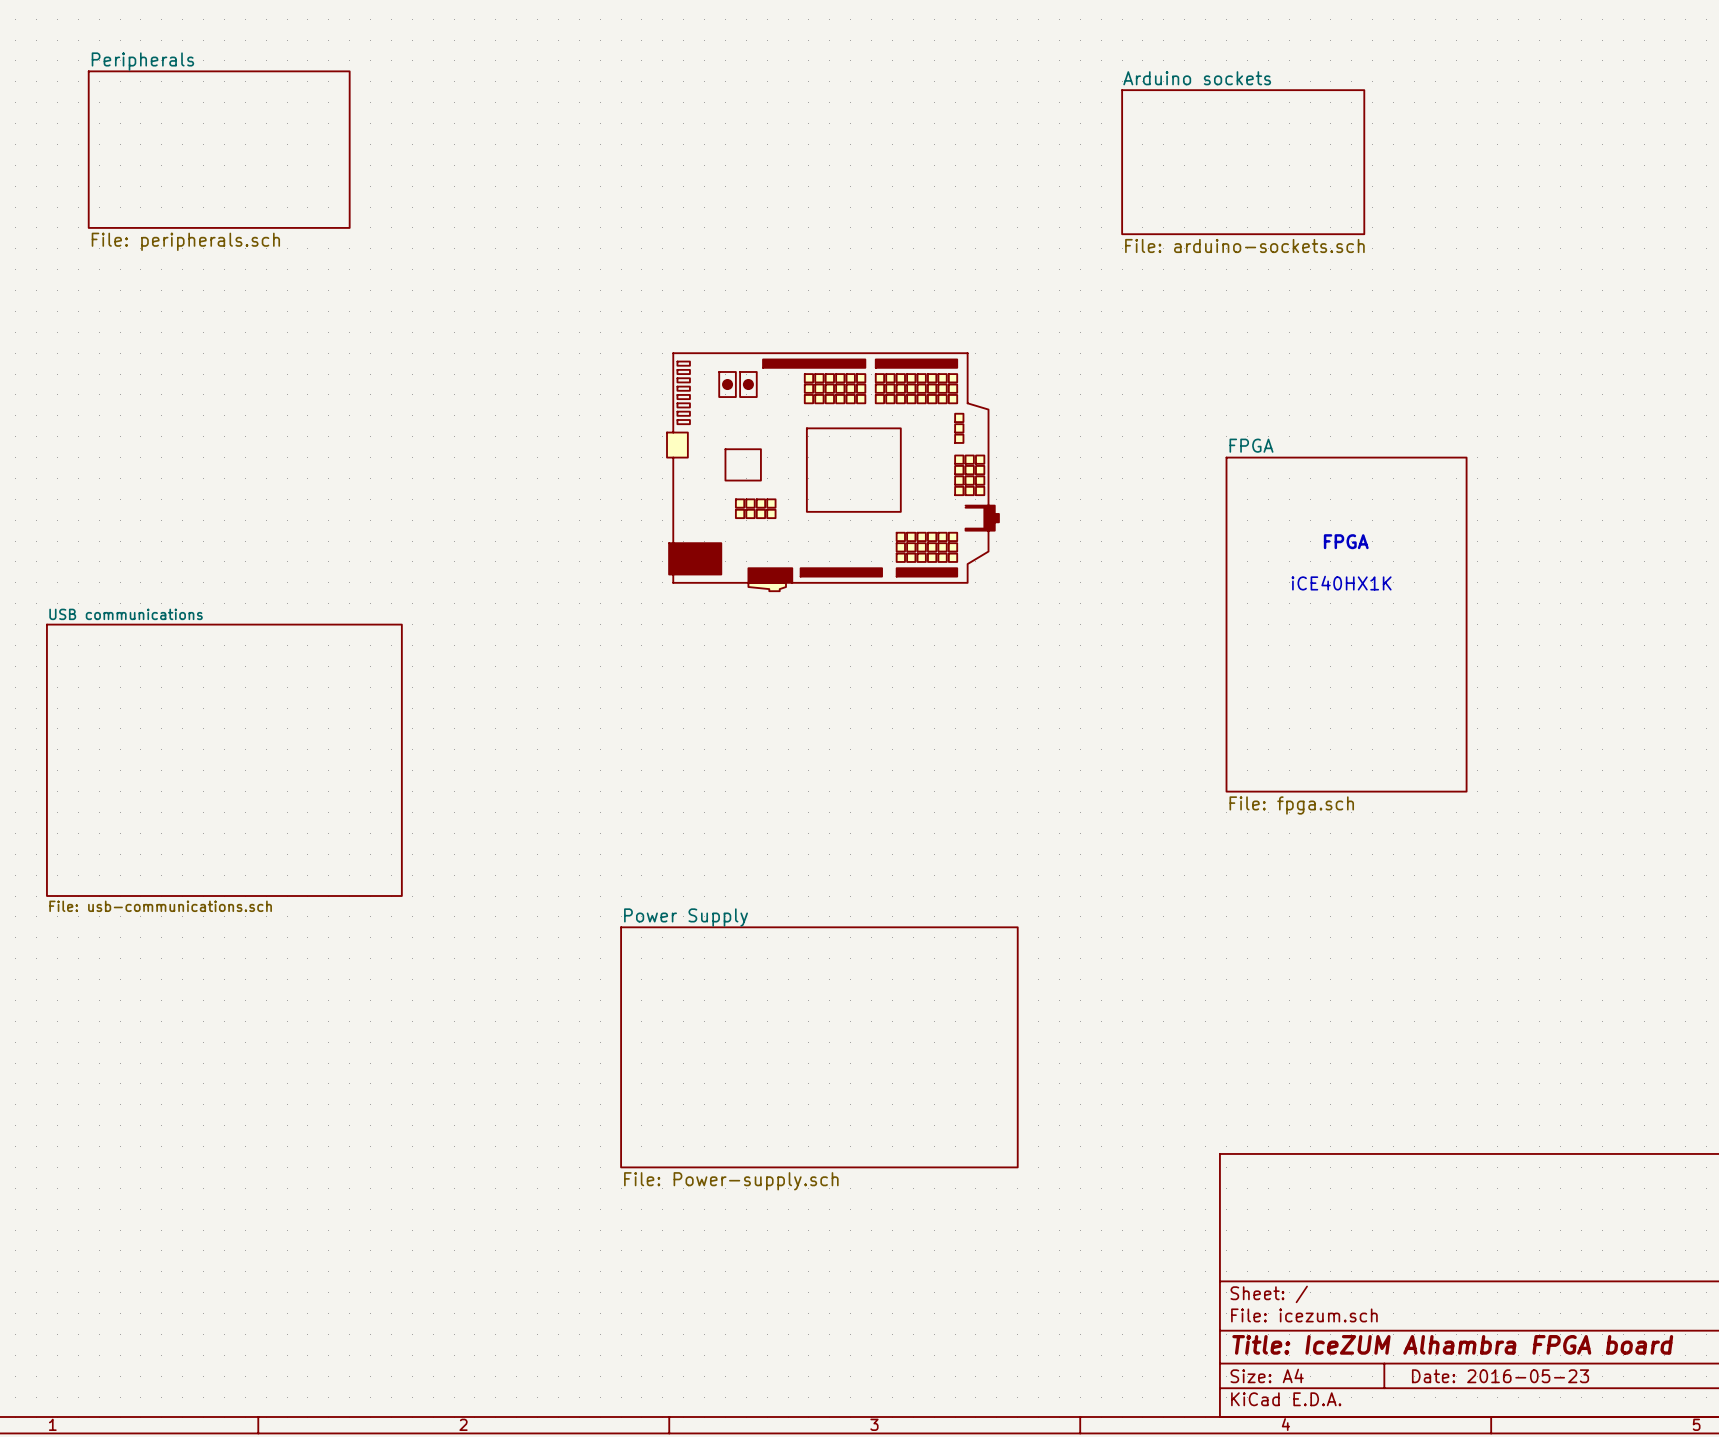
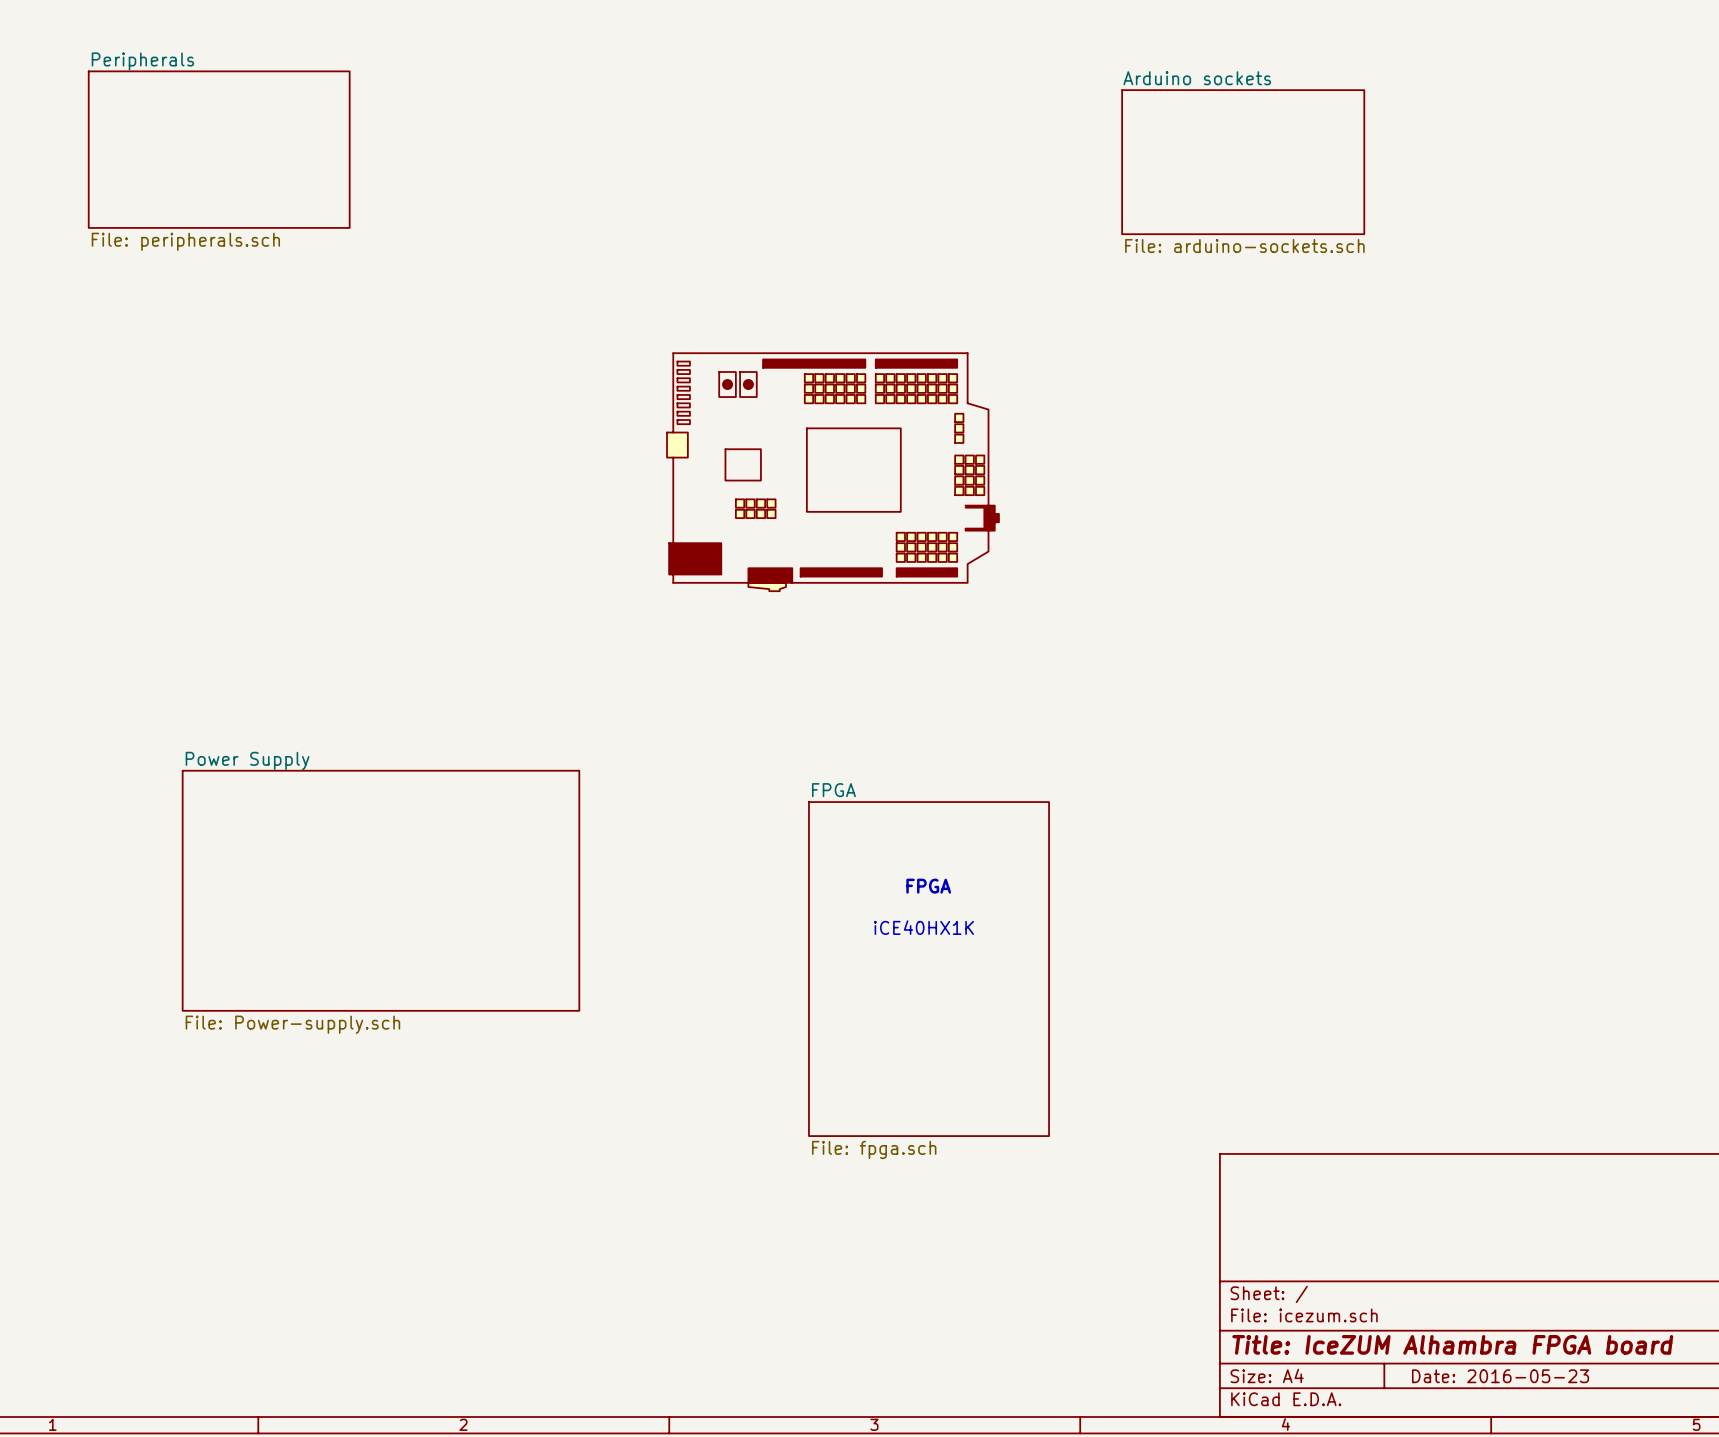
text: FPGA (1346, 541) -> none
text: iCE40HX1K (1341, 583) -> none
sheet FPGA: File: fpga.sch (1346, 624) -> none
sheet USB communications: File: usb-communications.sch (224, 760) -> none
text: none -> FPGA (928, 886)
sheet Power Supply: none -> File: Power-supply.sch (380, 890)
text: none -> iCE40HX1K (924, 927)
sheet FPGA: none -> File: fpga.sch (929, 969)
sheet Power Supply: File: Power-supply.sch (819, 1047) -> none

